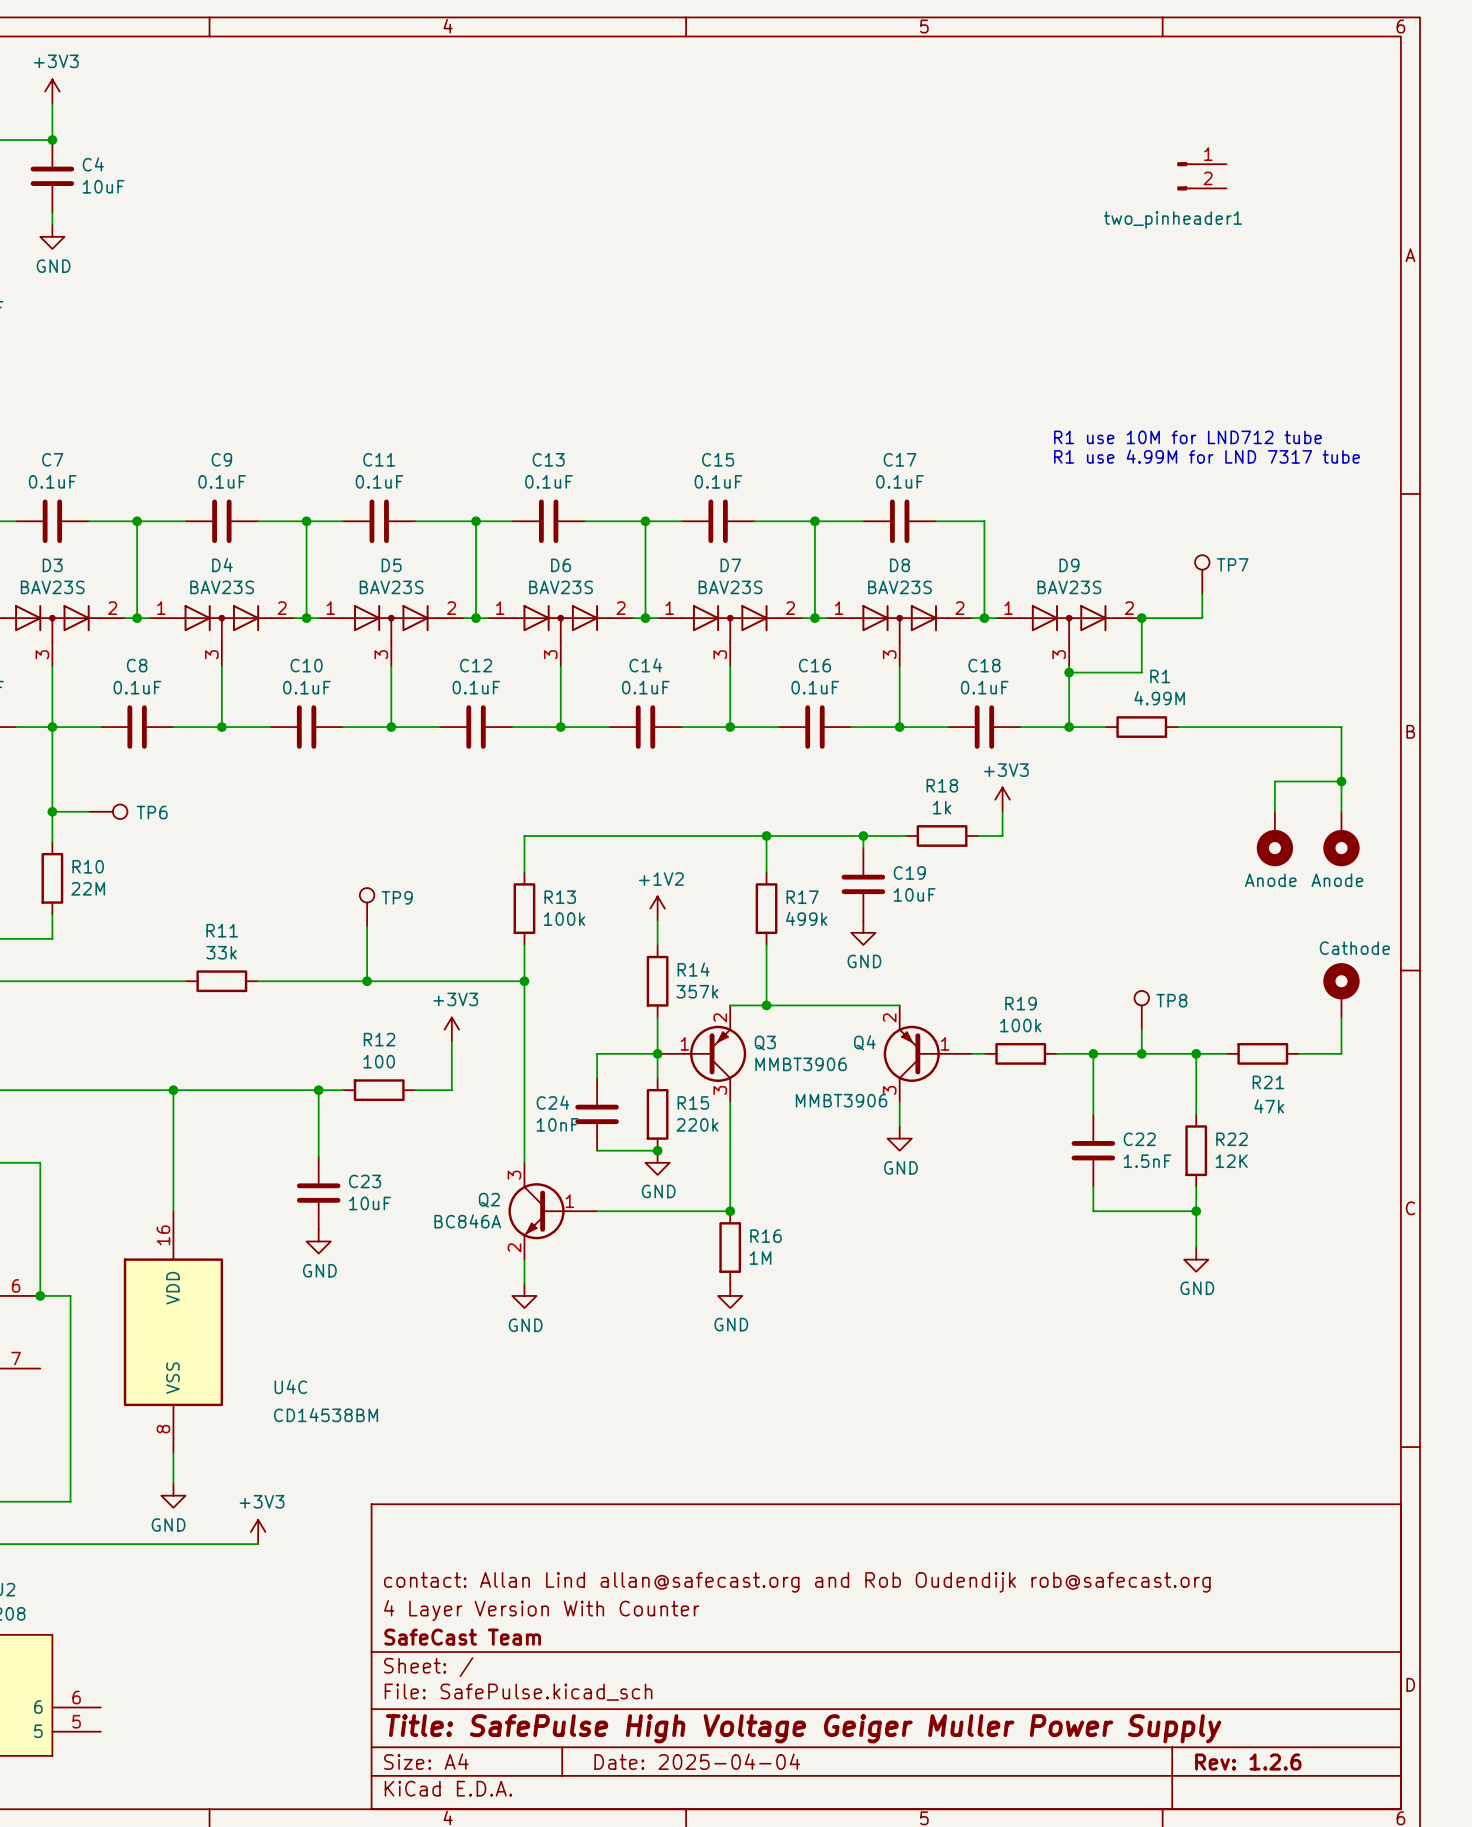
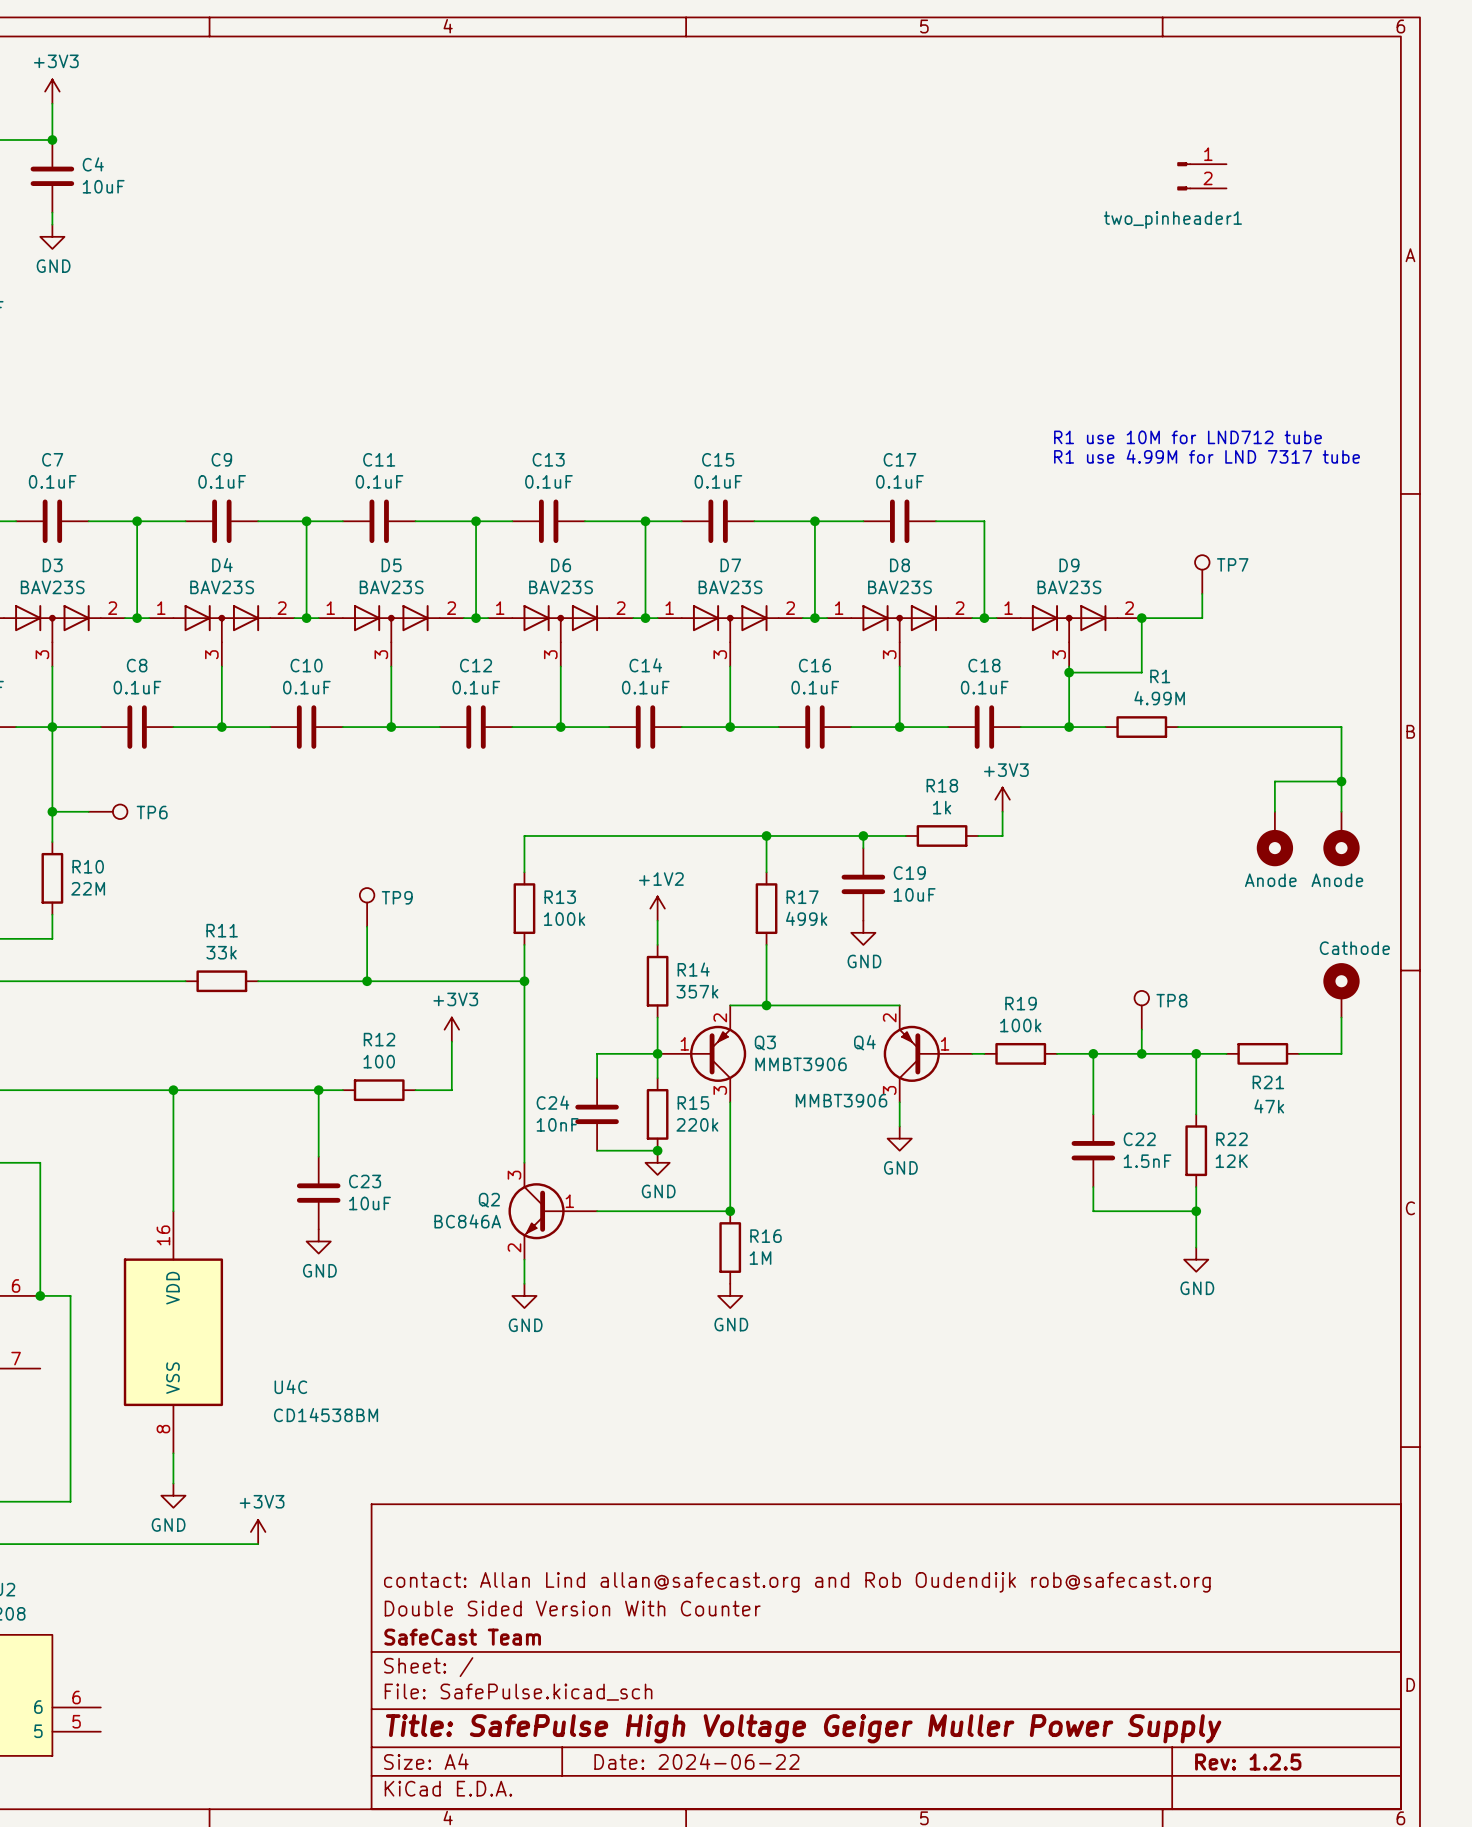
title block: 4 Layer Version With Counter (541, 1610) -> Double Sided Version With Counter (572, 1608)
title block: Date: 2025-04-04 (697, 1761) -> Date: 2024-06-22 (696, 1761)
title block: Rev: 1.2.6 (1248, 1762) -> Rev: 1.2.5 (1248, 1762)

